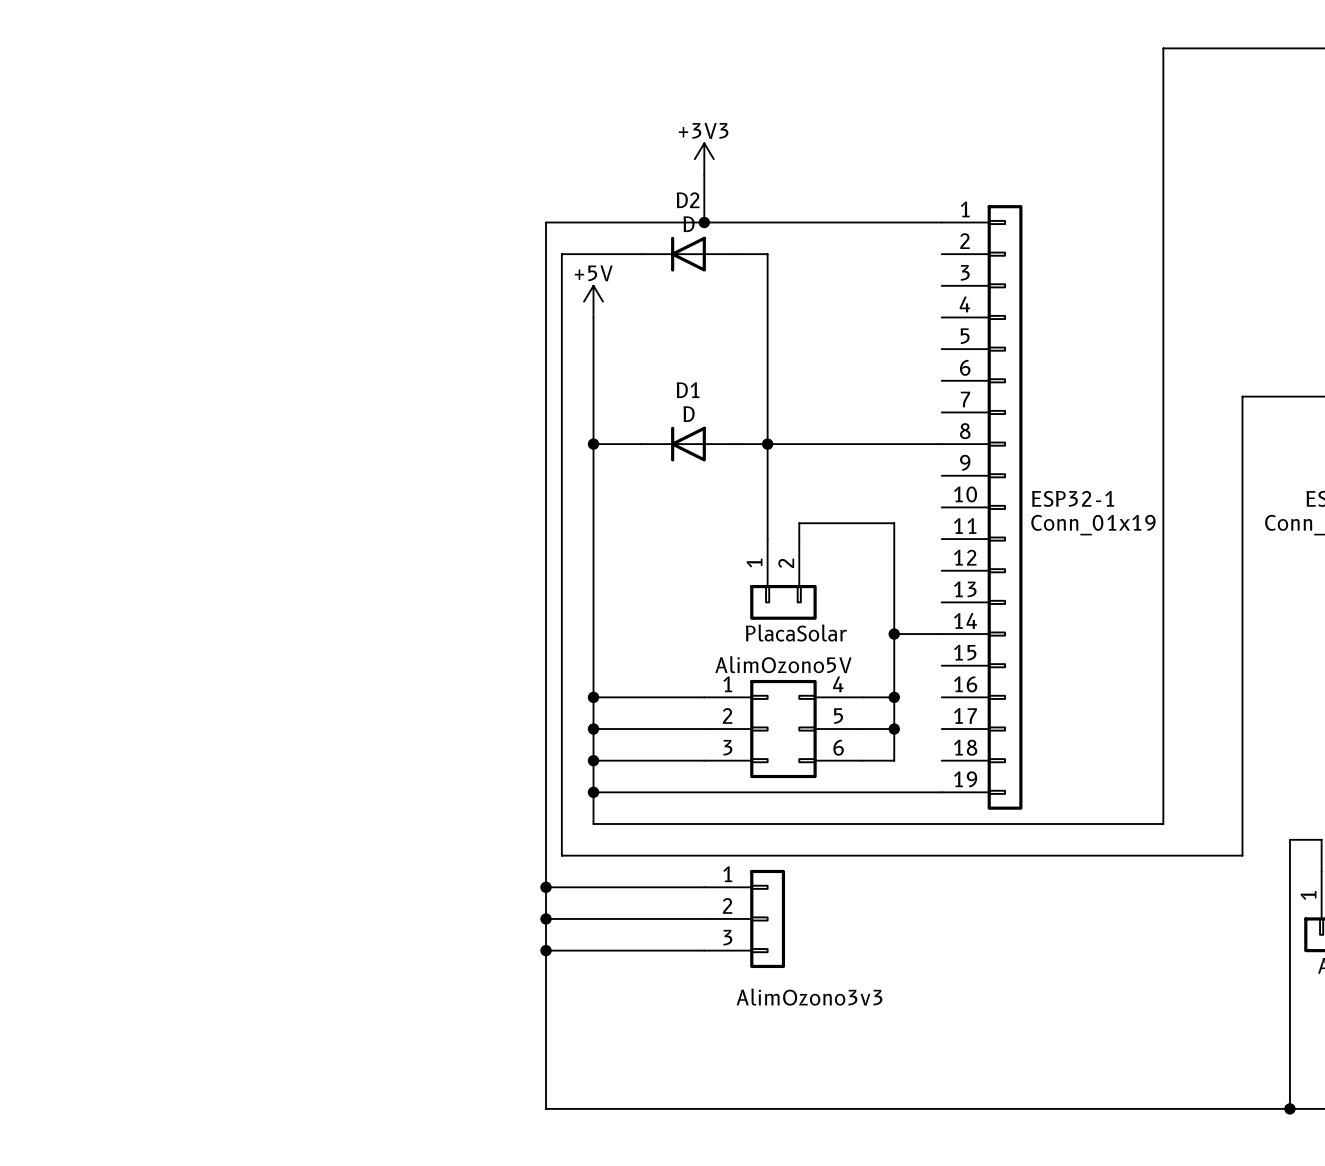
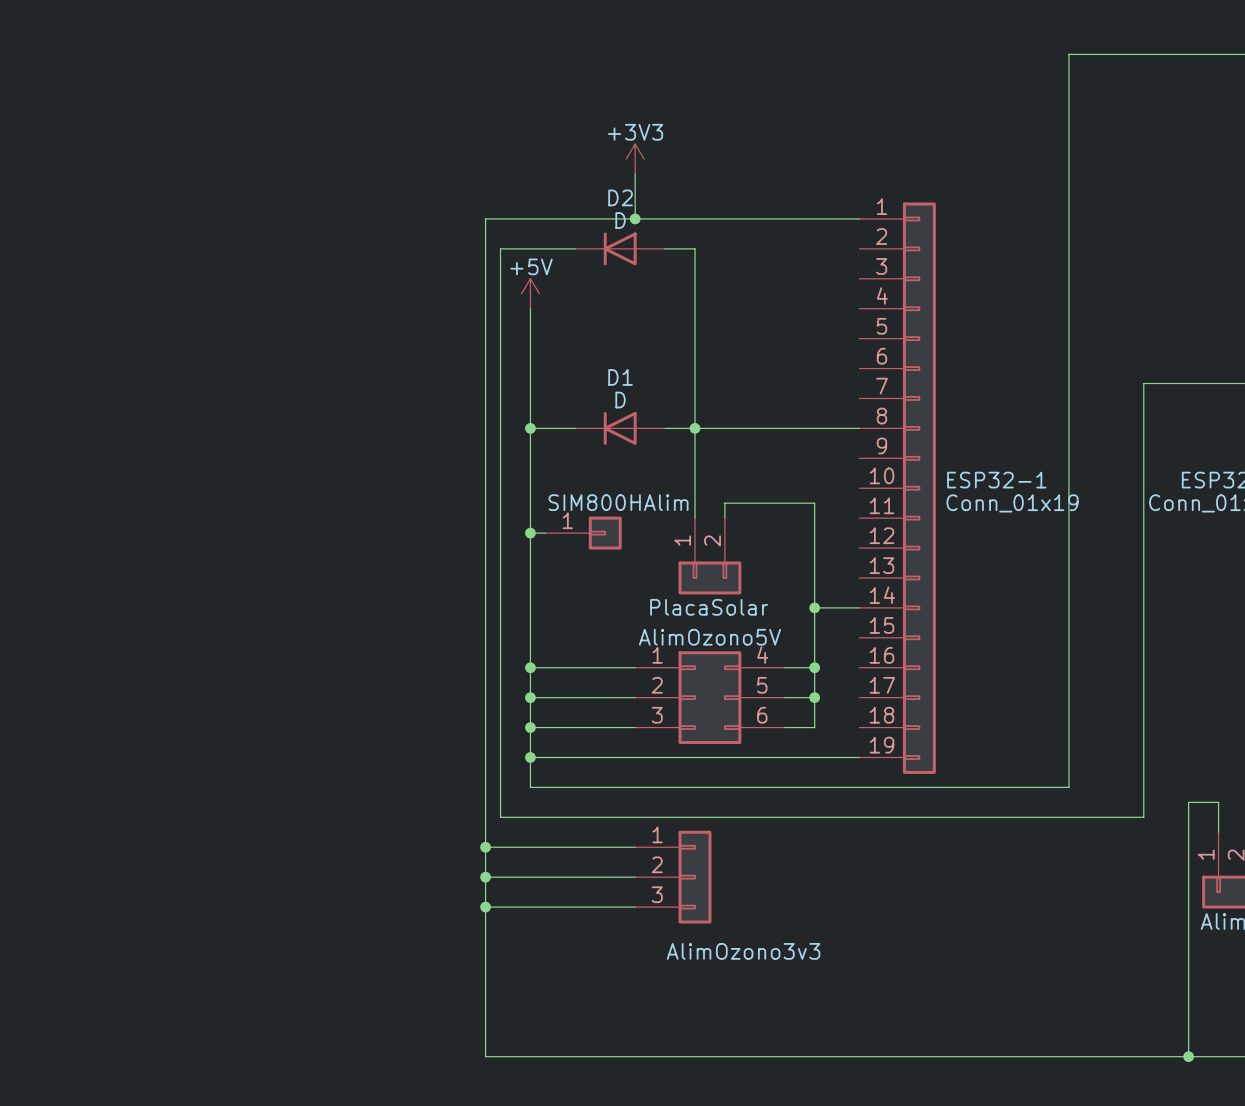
wire: none -> (530, 533) (545, 533)
junction: none -> (530, 533)
SIM800HAlim: none -> (583, 533)

